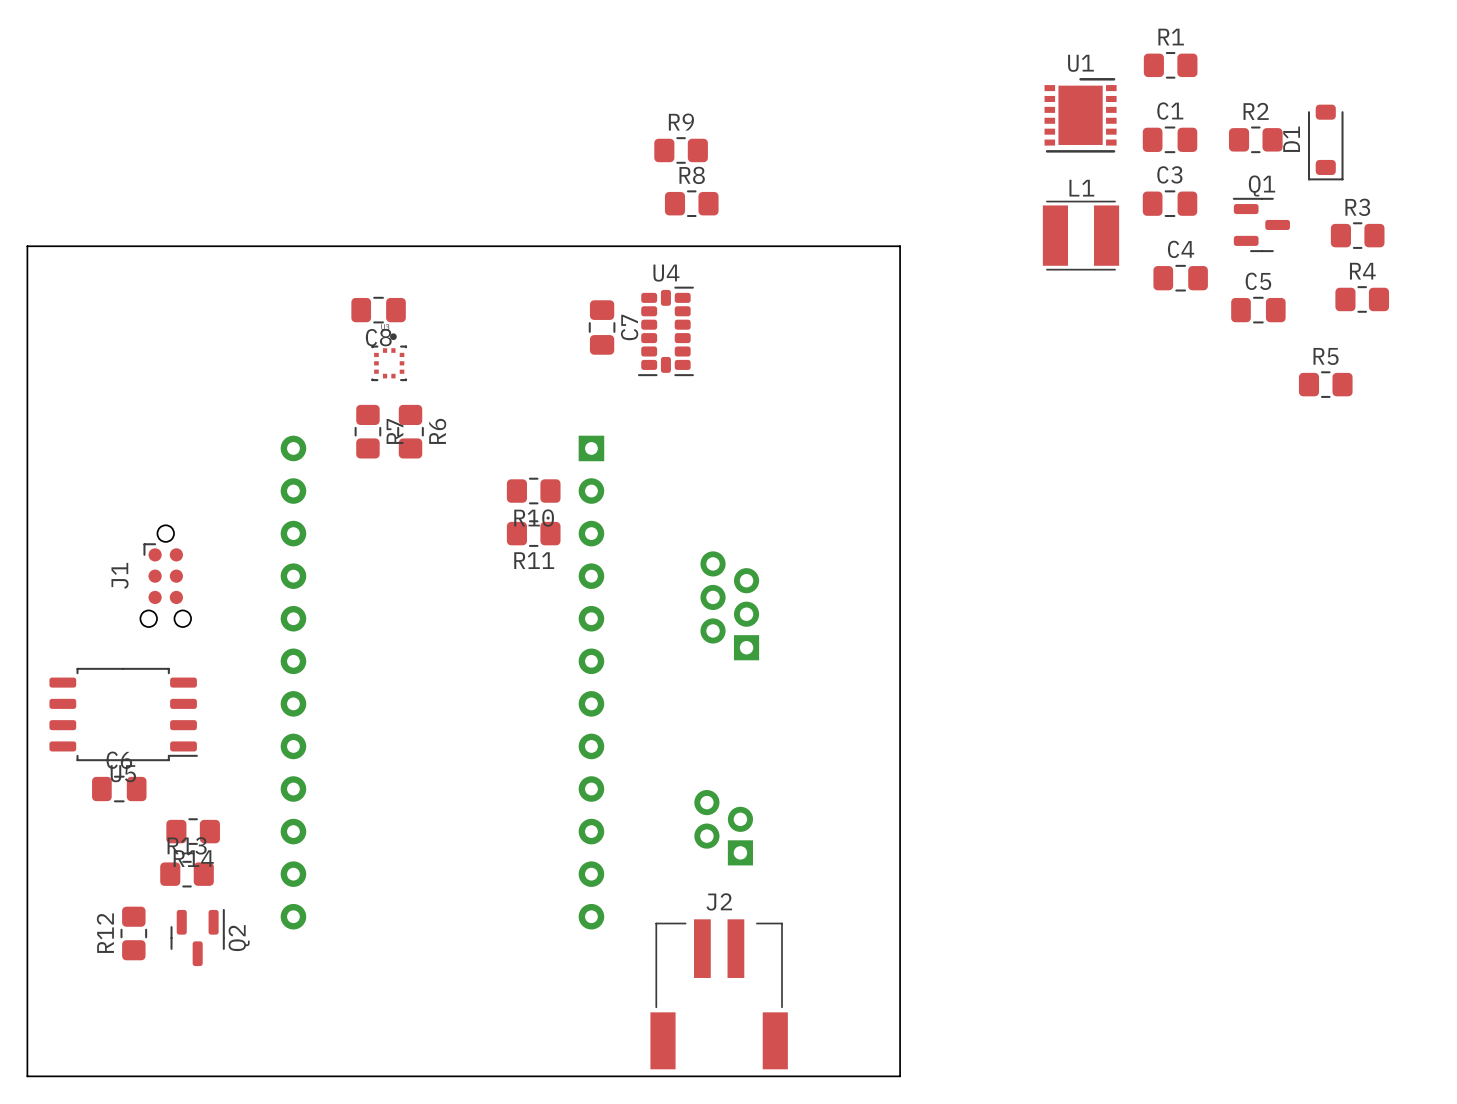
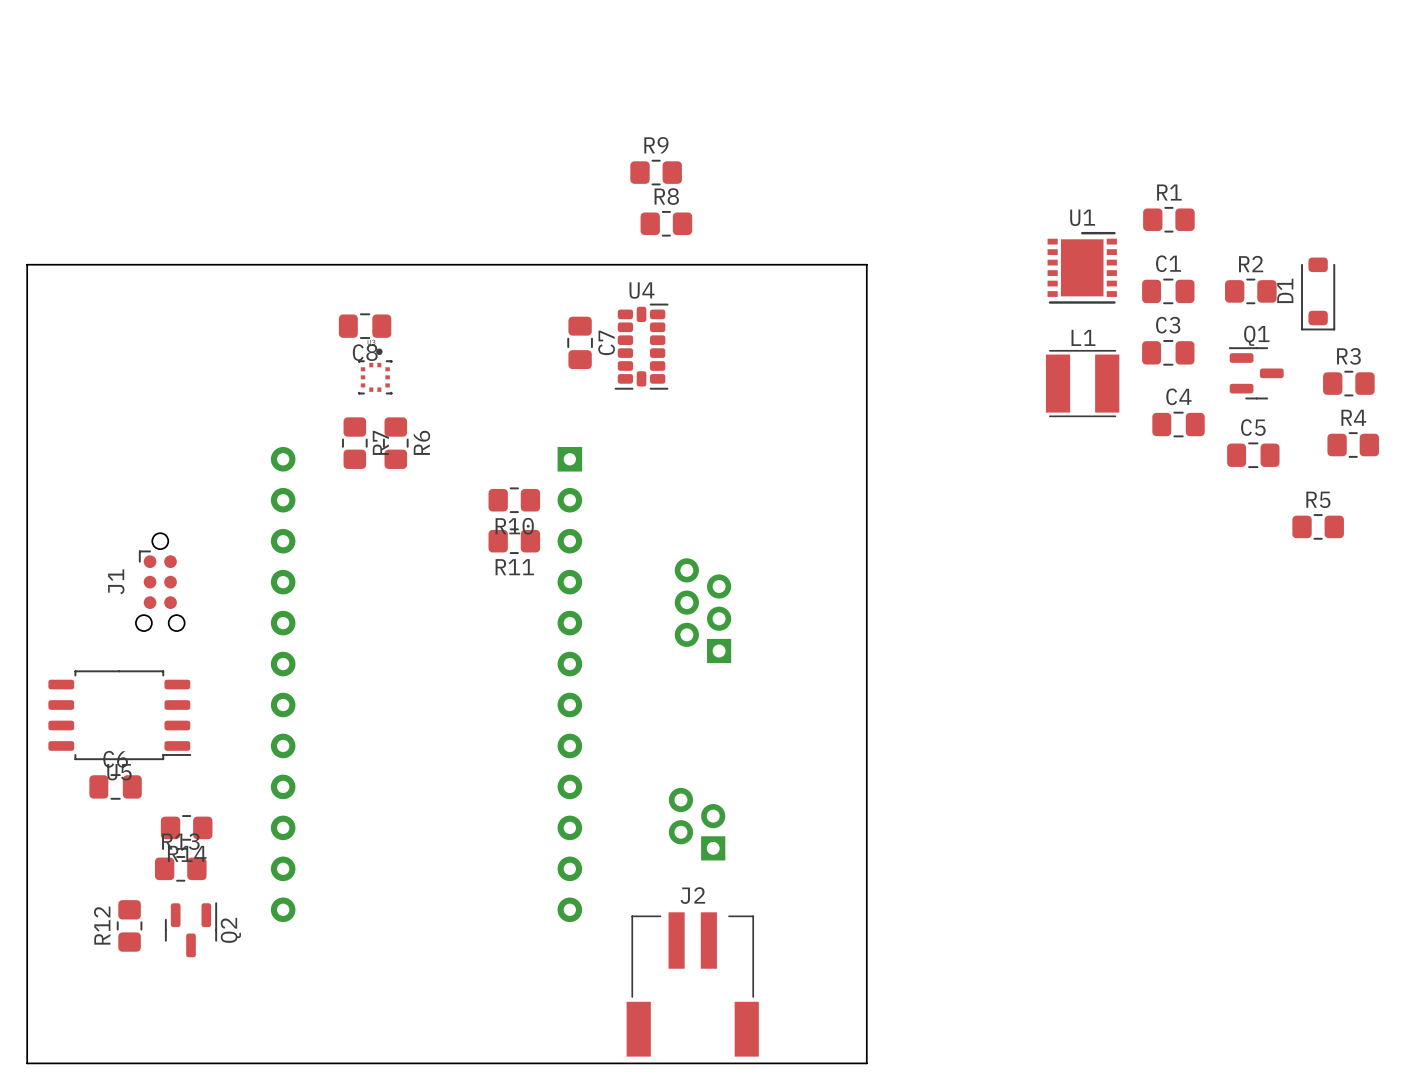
R1 position: (1170, 65) -> (1168, 219)
U1 position: (1080, 115) -> (1082, 267)
C1 position: (1170, 139) -> (1168, 291)
R2 position: (1255, 139) -> (1250, 291)
D1 position: (1325, 142) -> (1318, 293)
C3 position: (1170, 203) -> (1168, 352)
Q1 position: (1261, 224) -> (1256, 373)
L1 position: (1080, 235) -> (1082, 383)
R3 position: (1357, 235) -> (1348, 383)
C4 position: (1180, 278) -> (1178, 424)
R4 position: (1362, 299) -> (1353, 445)
C5 position: (1258, 310) -> (1253, 455)
R5 position: (1325, 384) -> (1318, 526)

